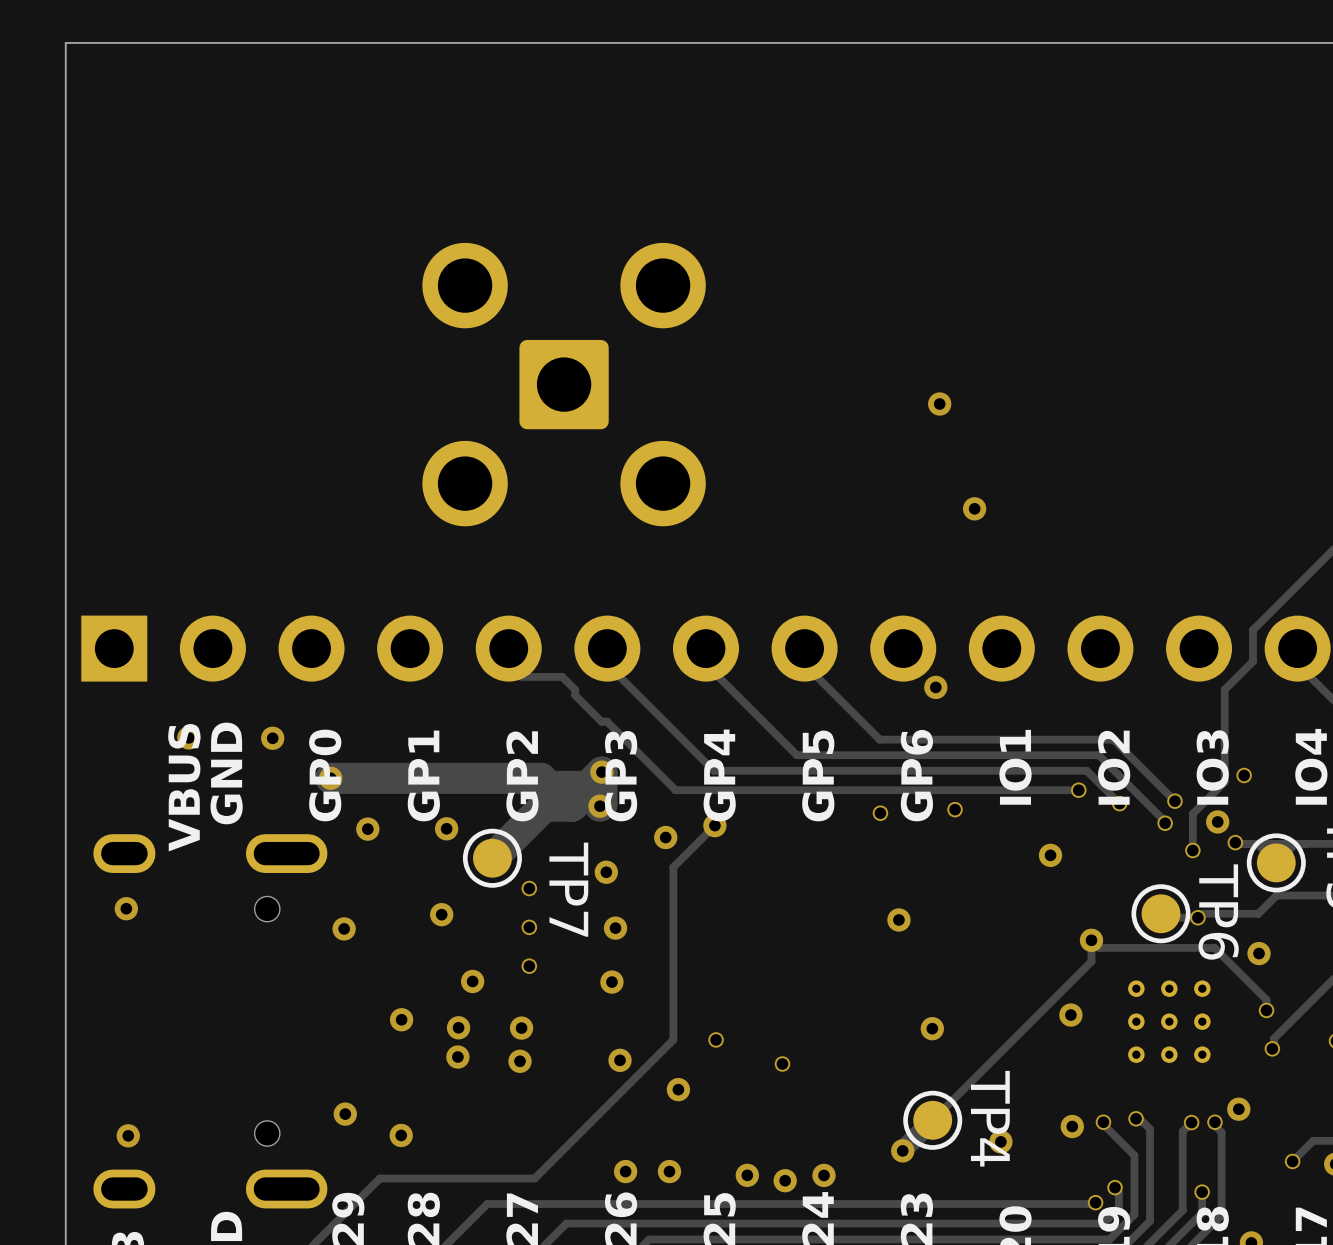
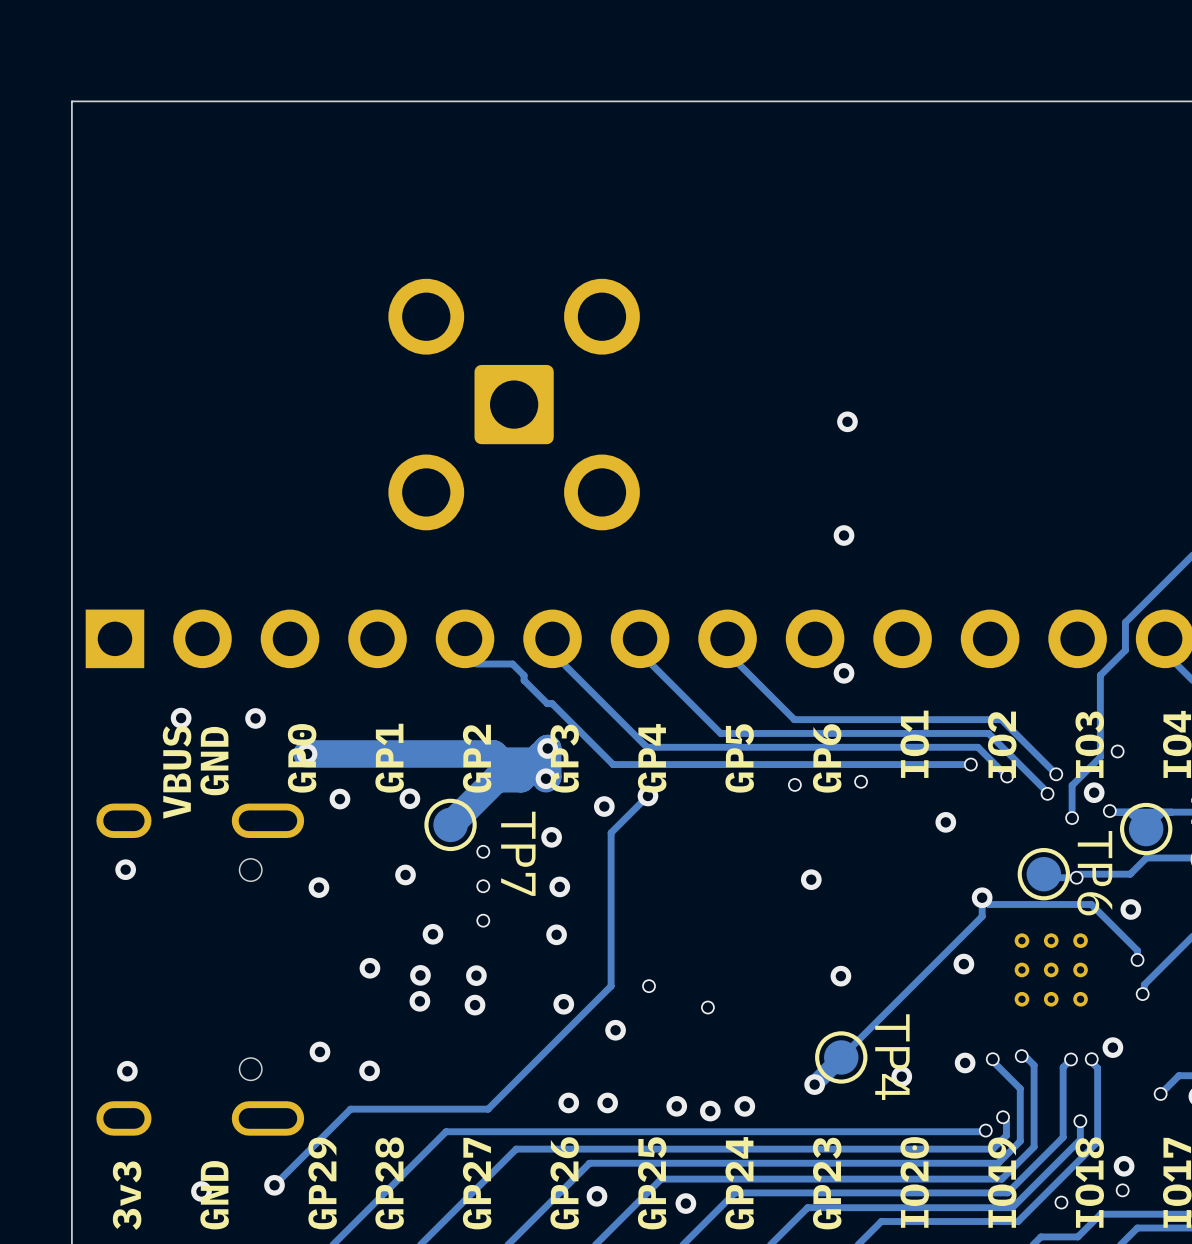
via position: (974, 508) -> (844, 535)

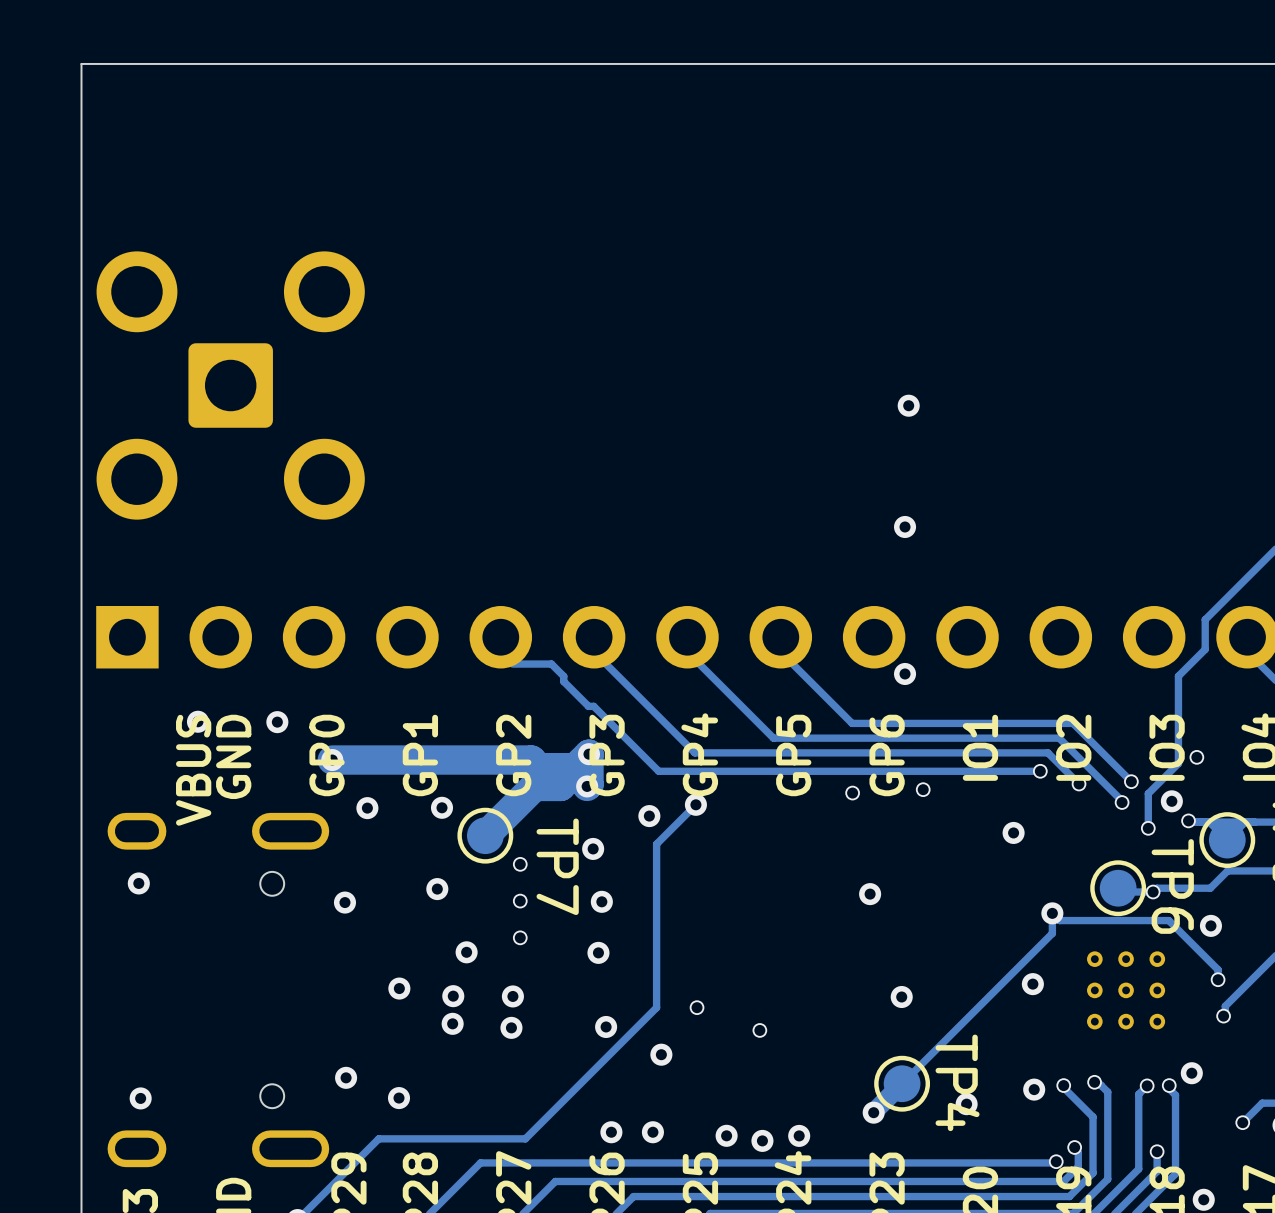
part position: (514, 404) -> (230, 385)

